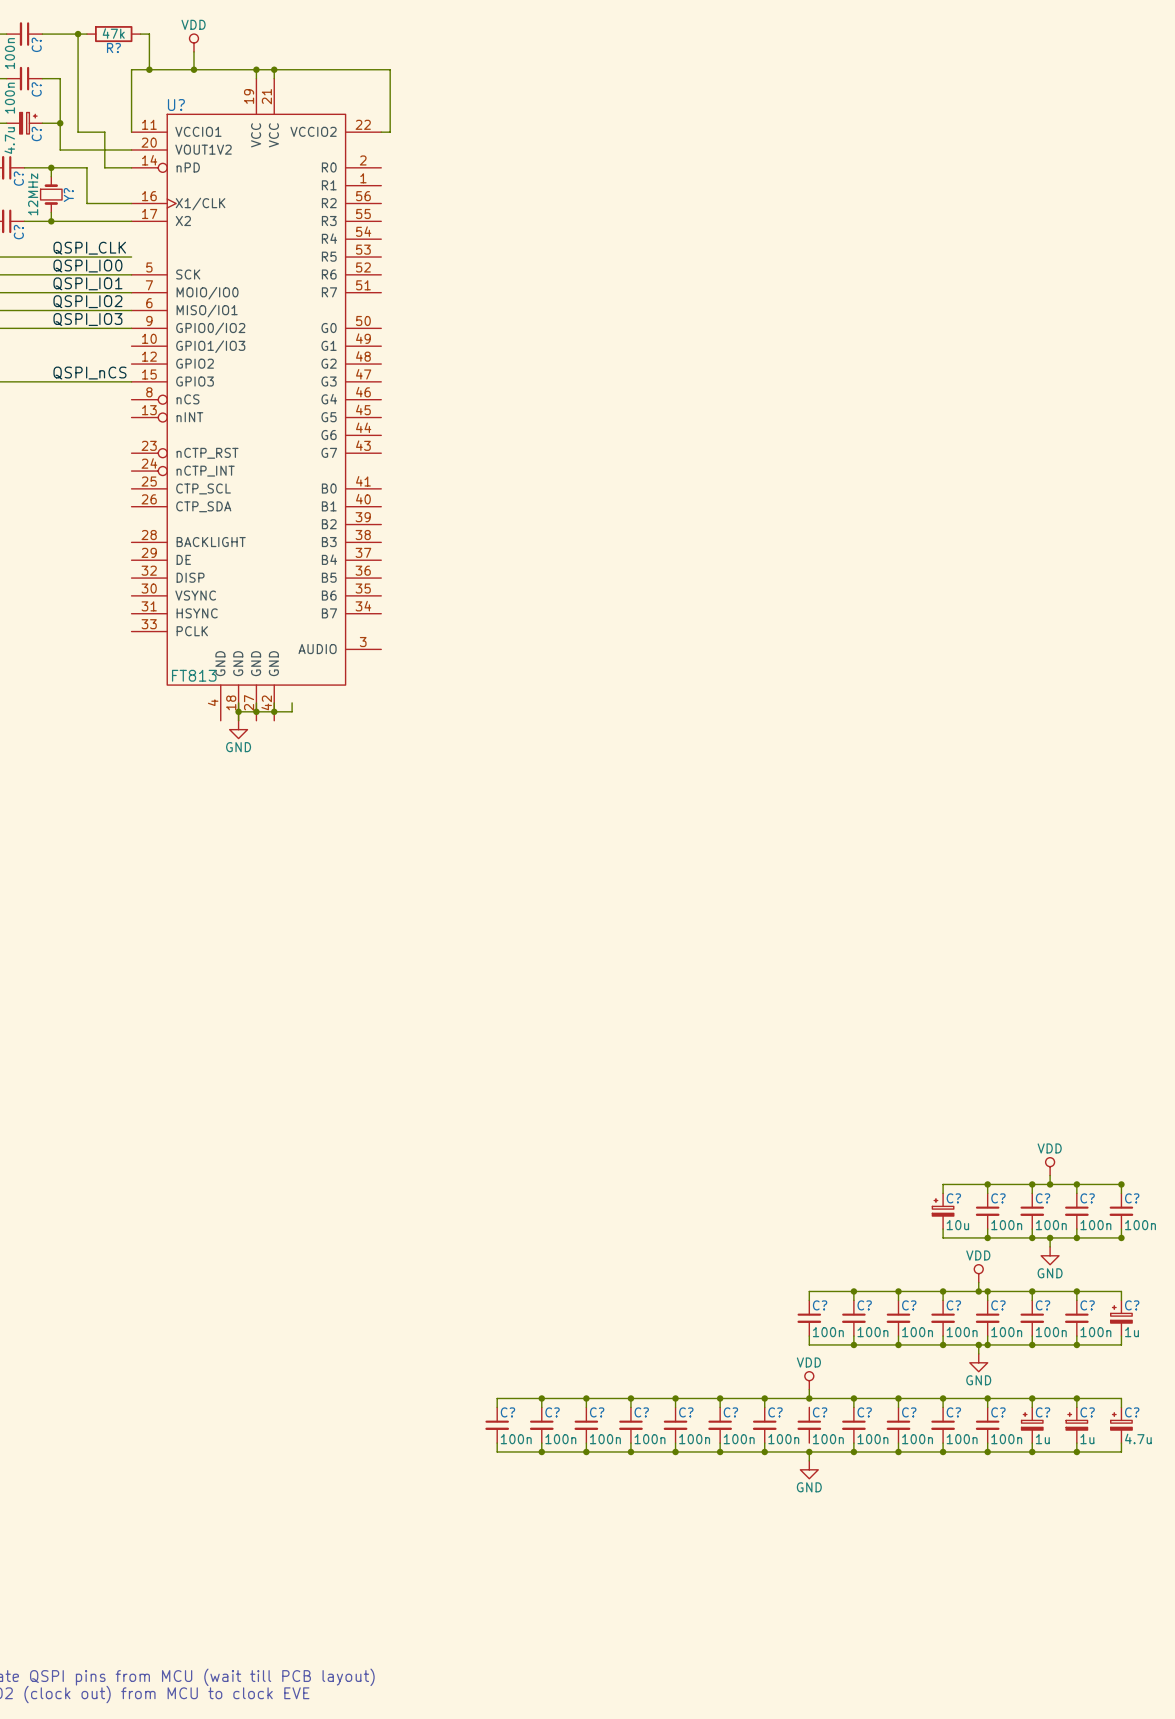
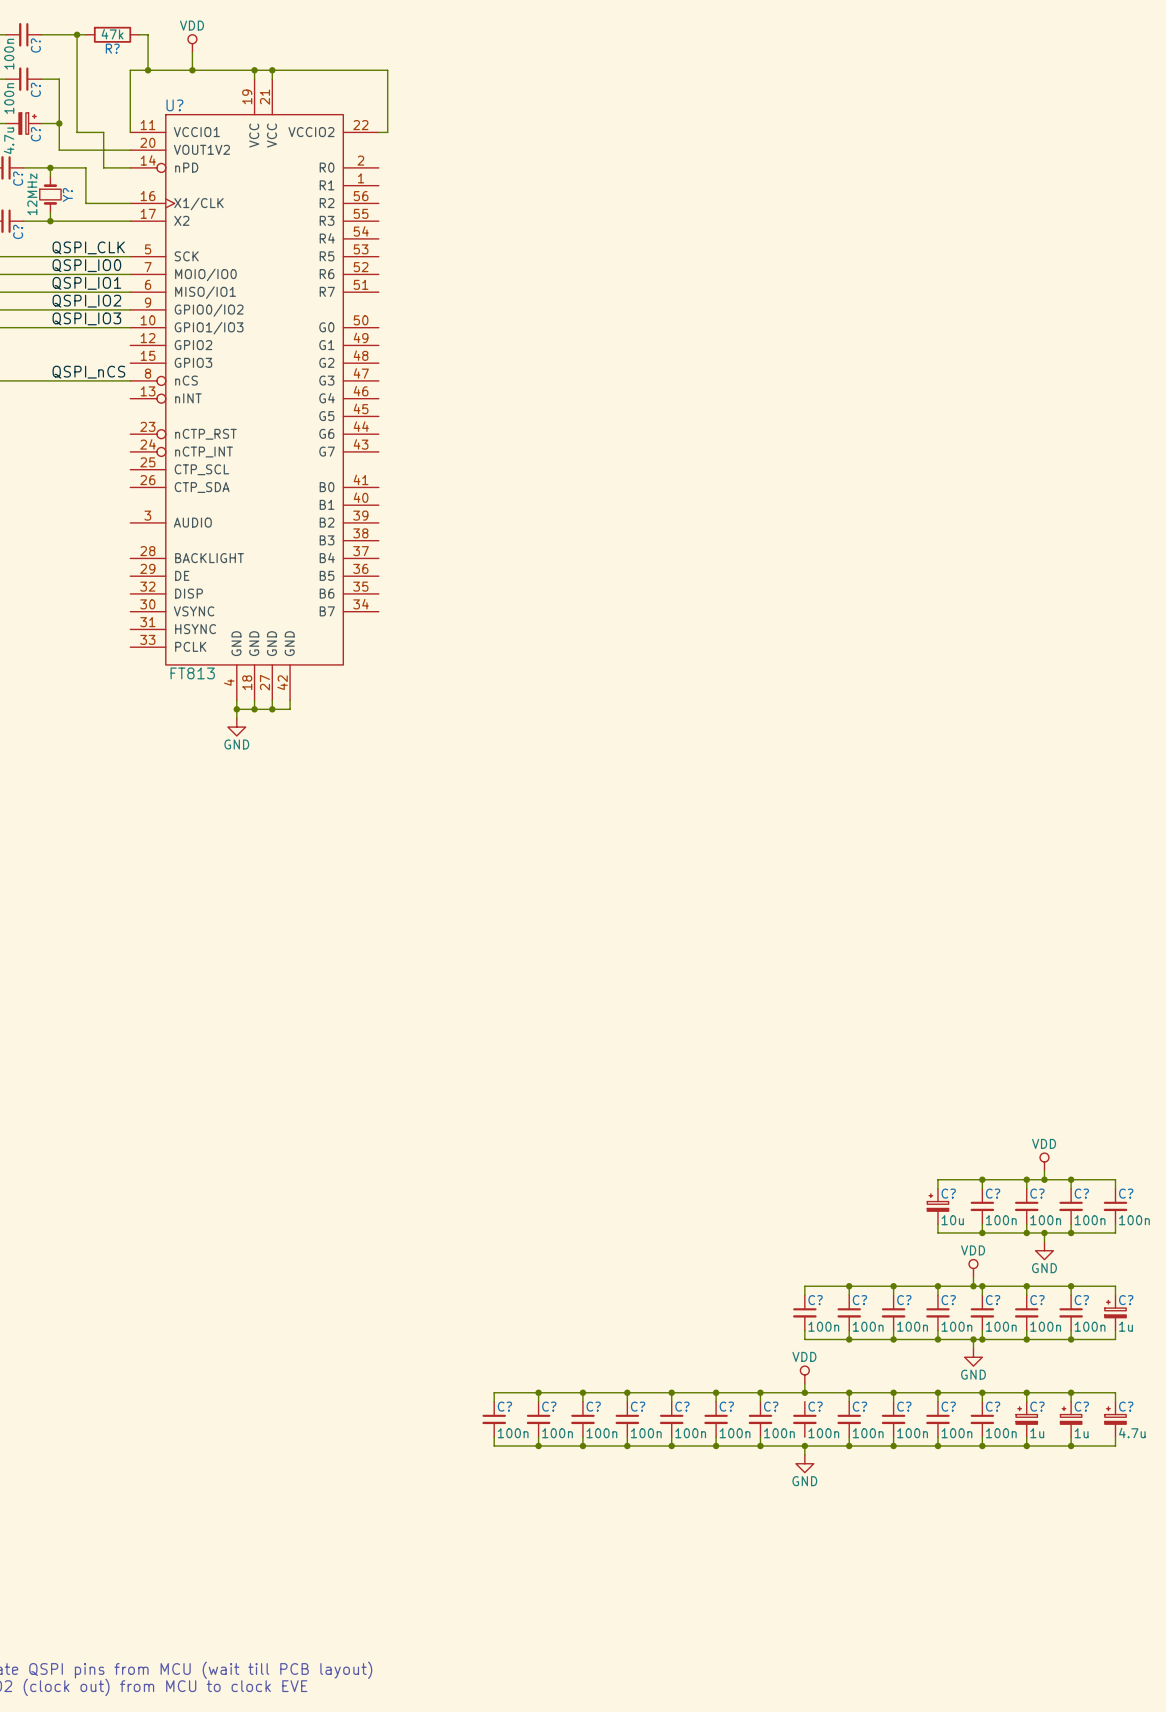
U?: none -> FT813 (254, 389)
U?: FT813 (256, 399) -> none
junction: (1121, 1184) -> none
junction: (1121, 1237) -> none

